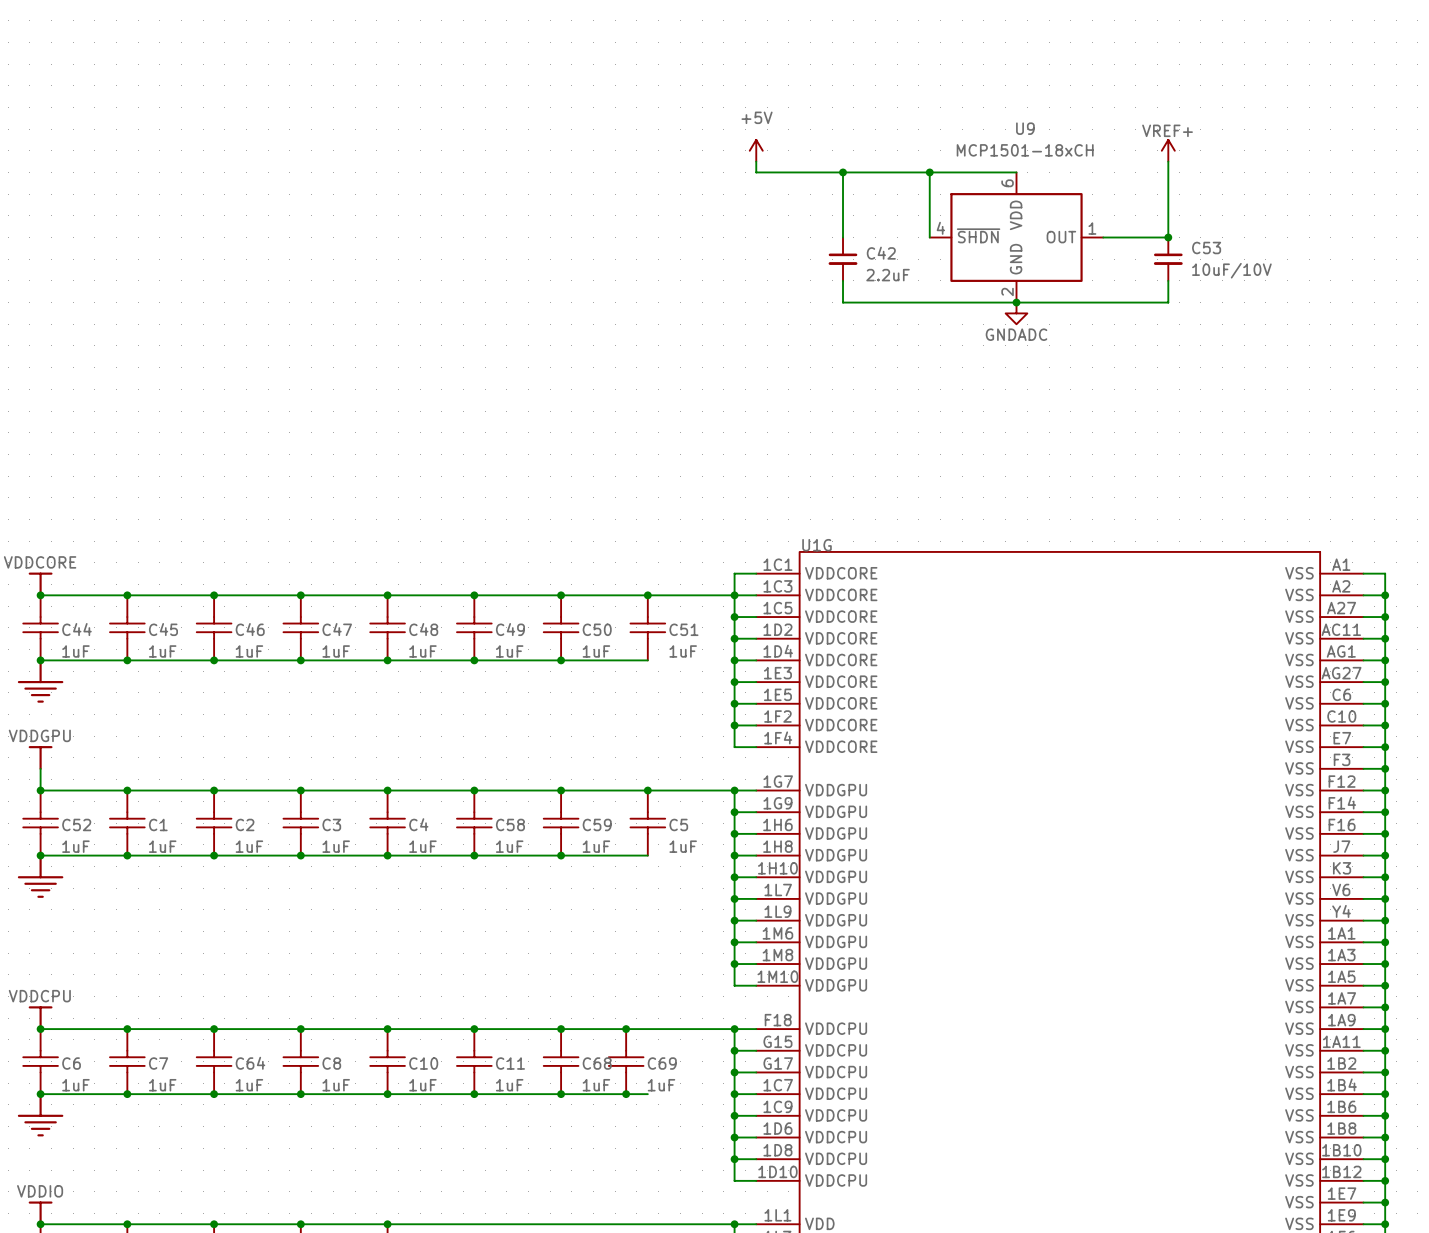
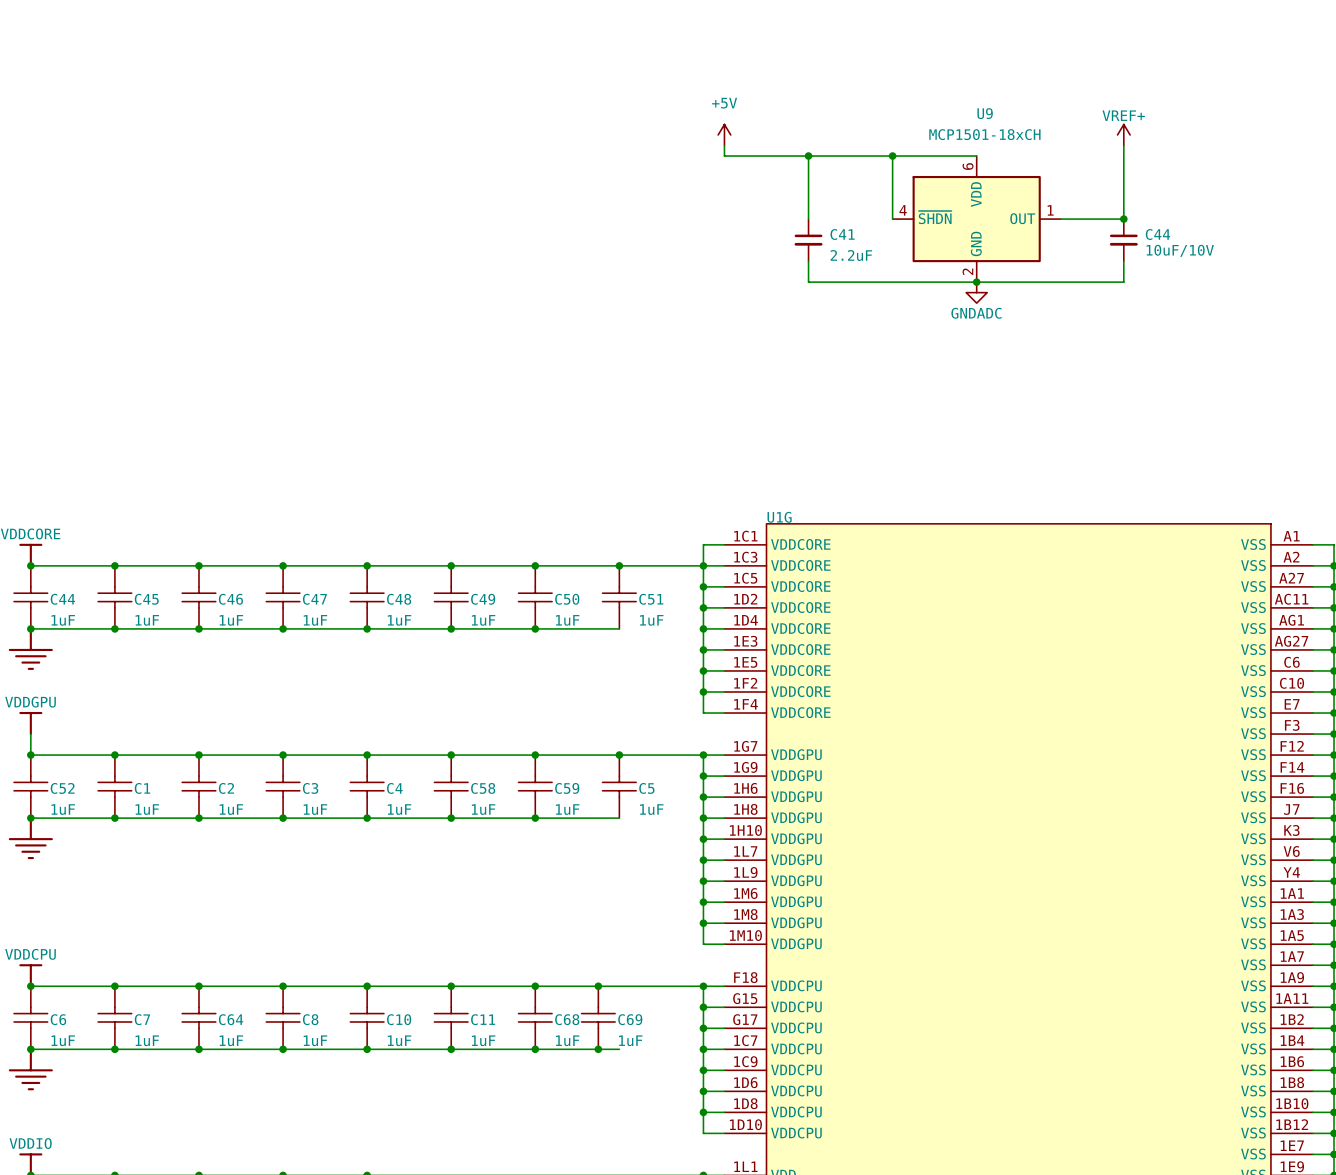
C53 name: C53 (1206, 247) -> C44 (1158, 234)
C42 name: C42 (881, 253) -> C41 (842, 234)

